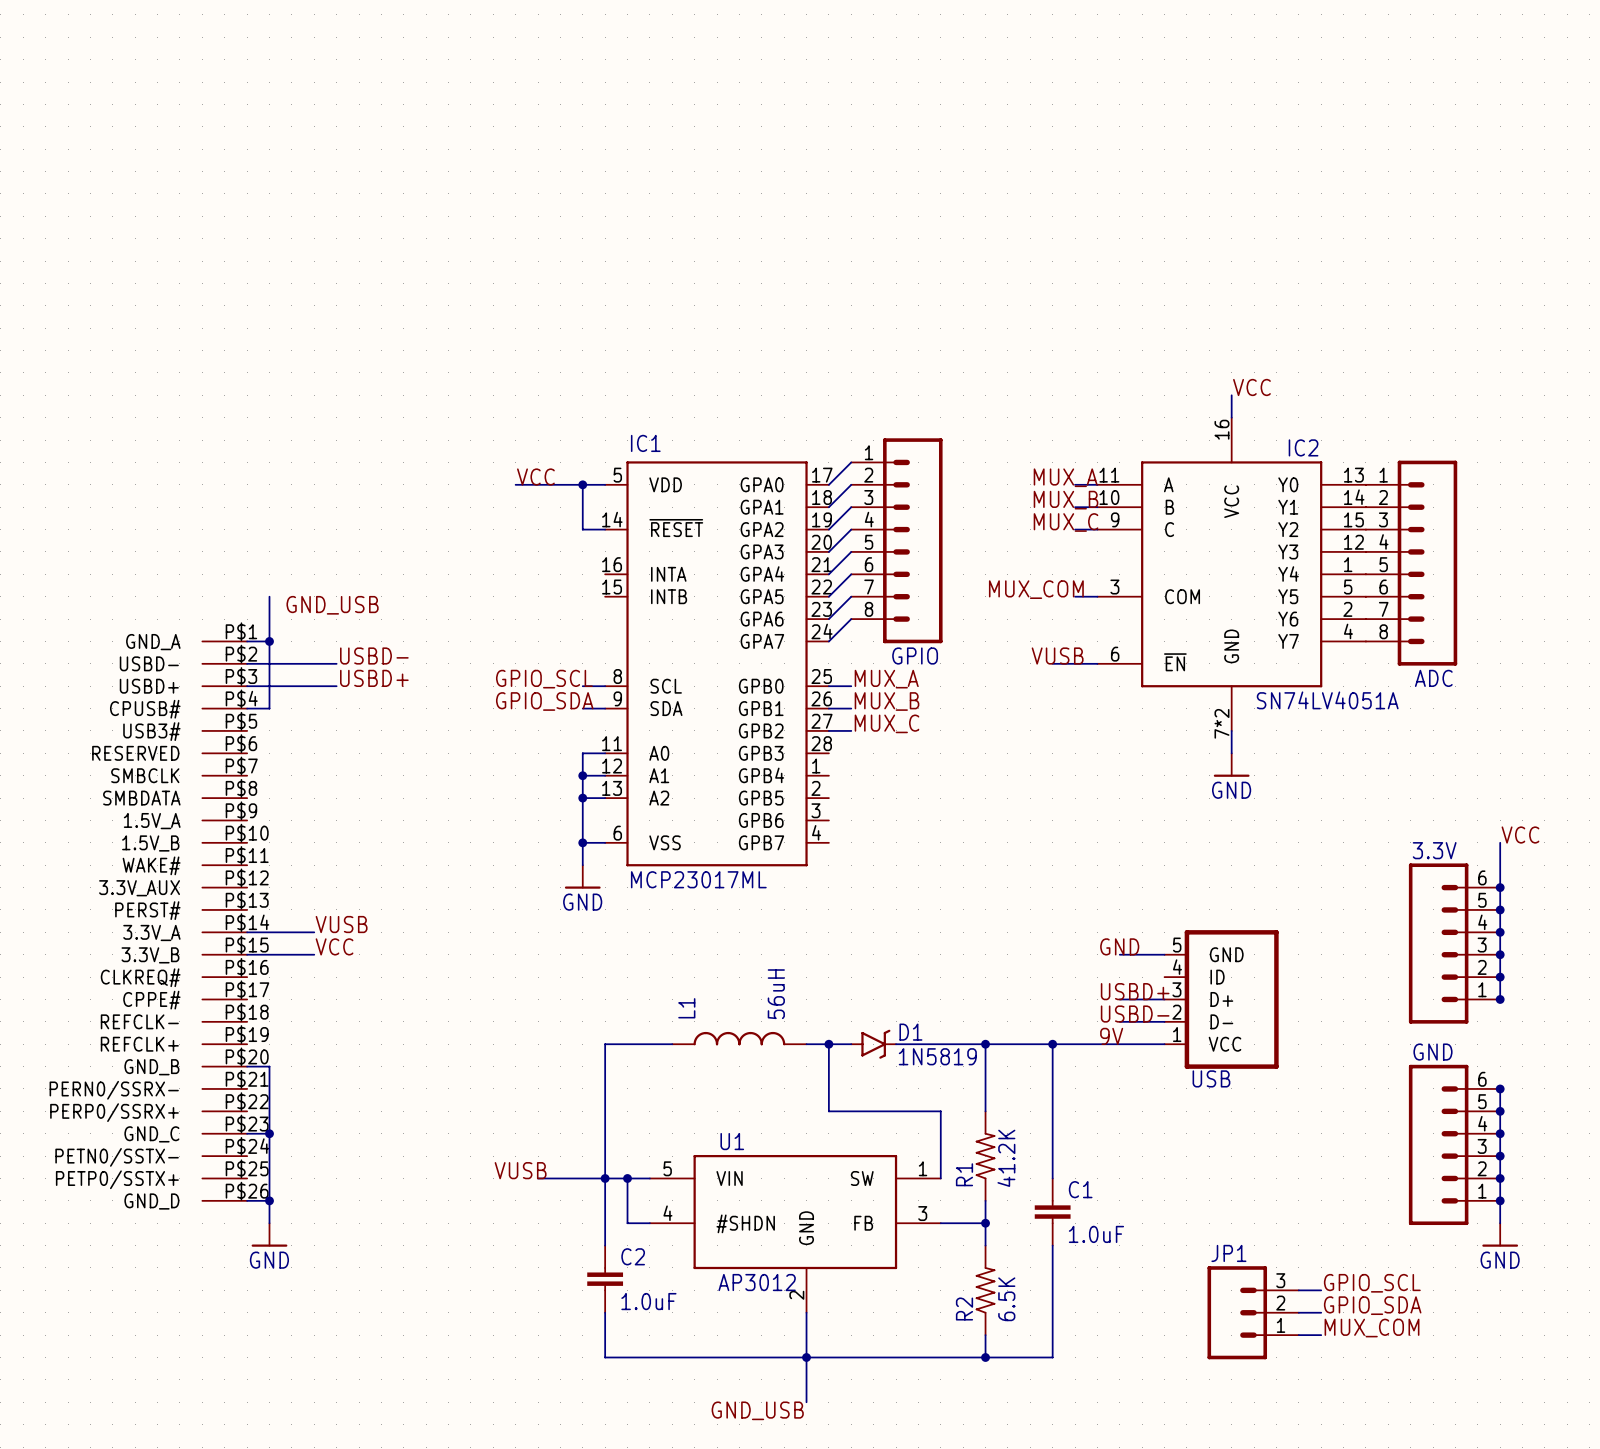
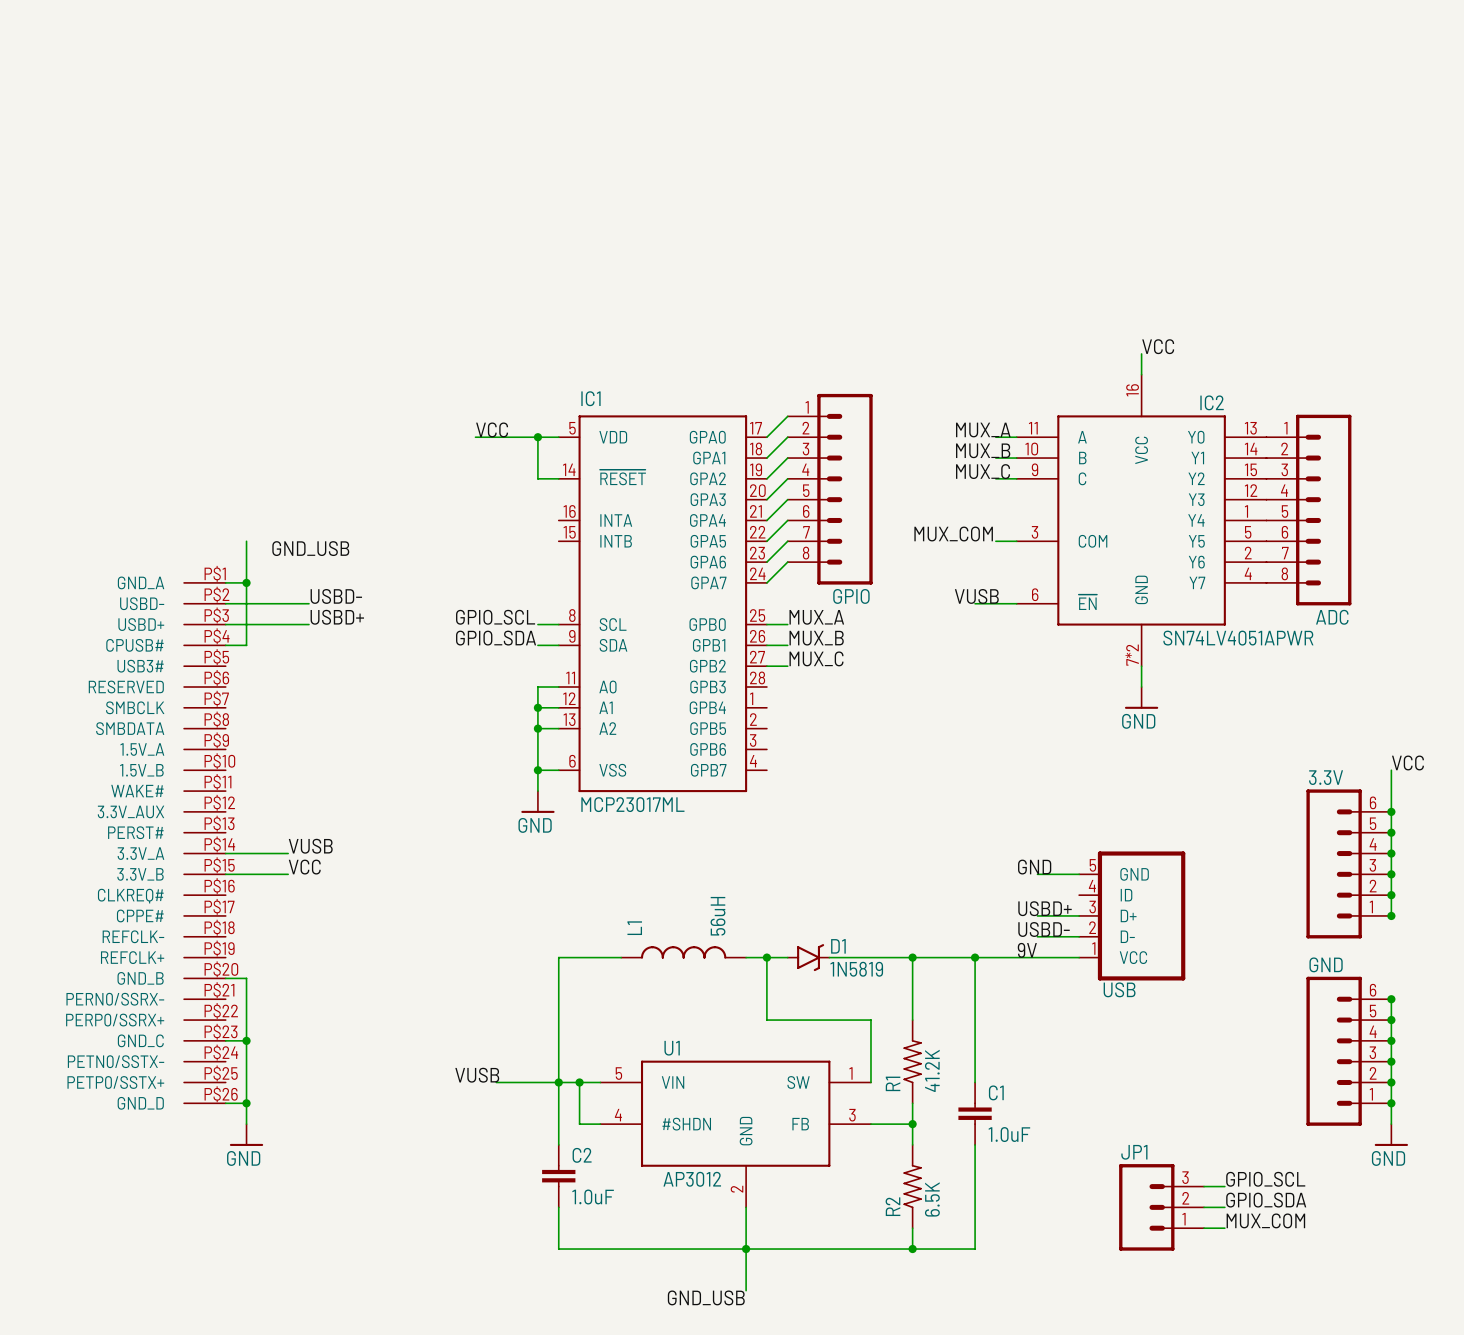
IC2 value: SN74LV4051A (1327, 700) -> SN74LV4051APWR (1238, 638)

